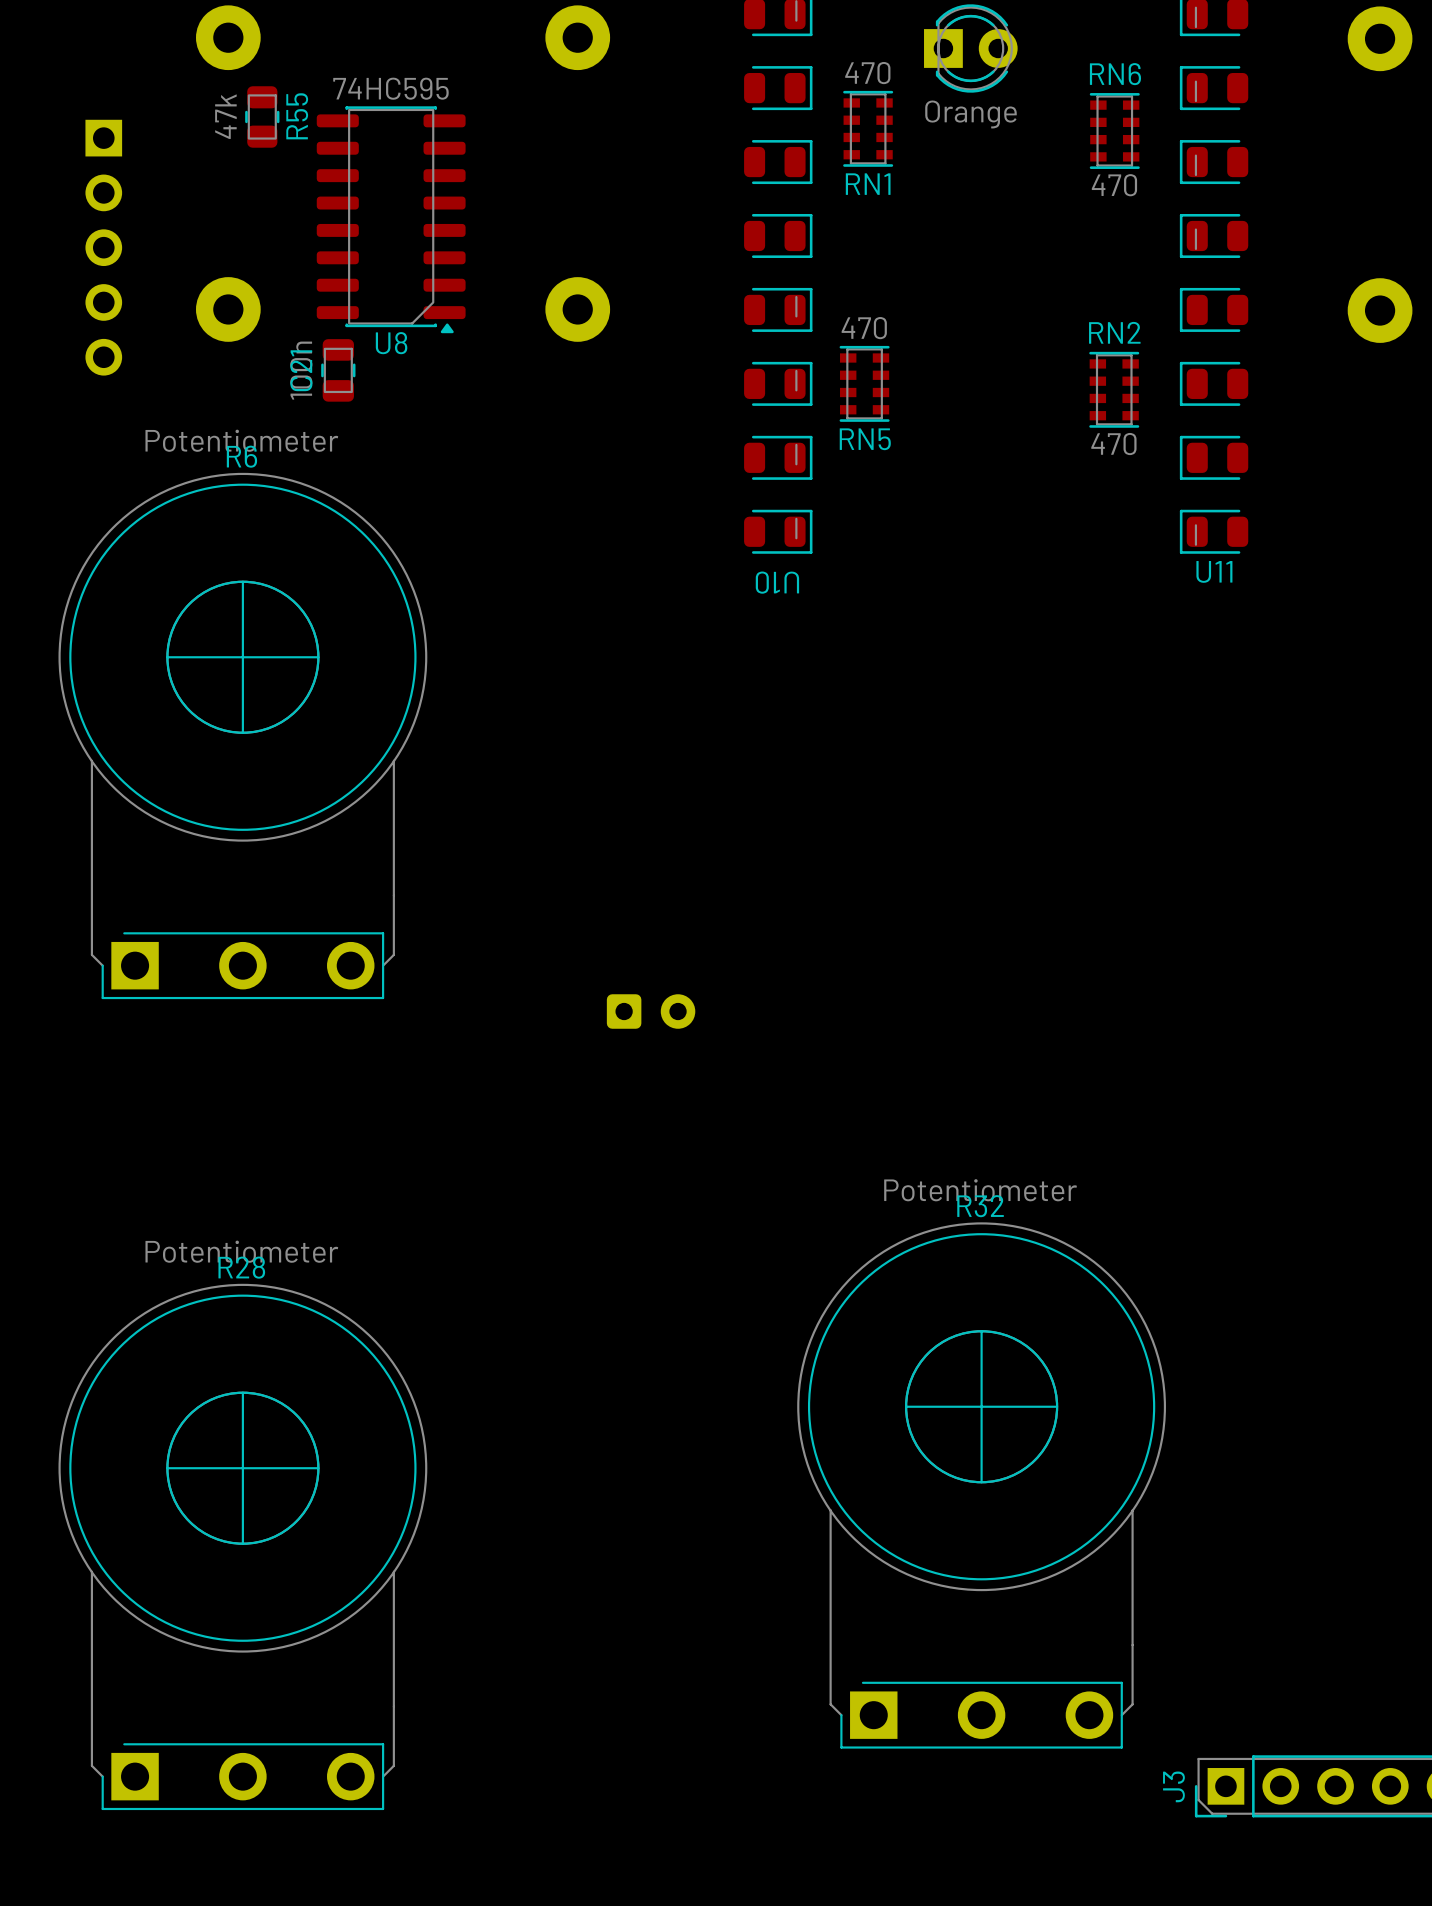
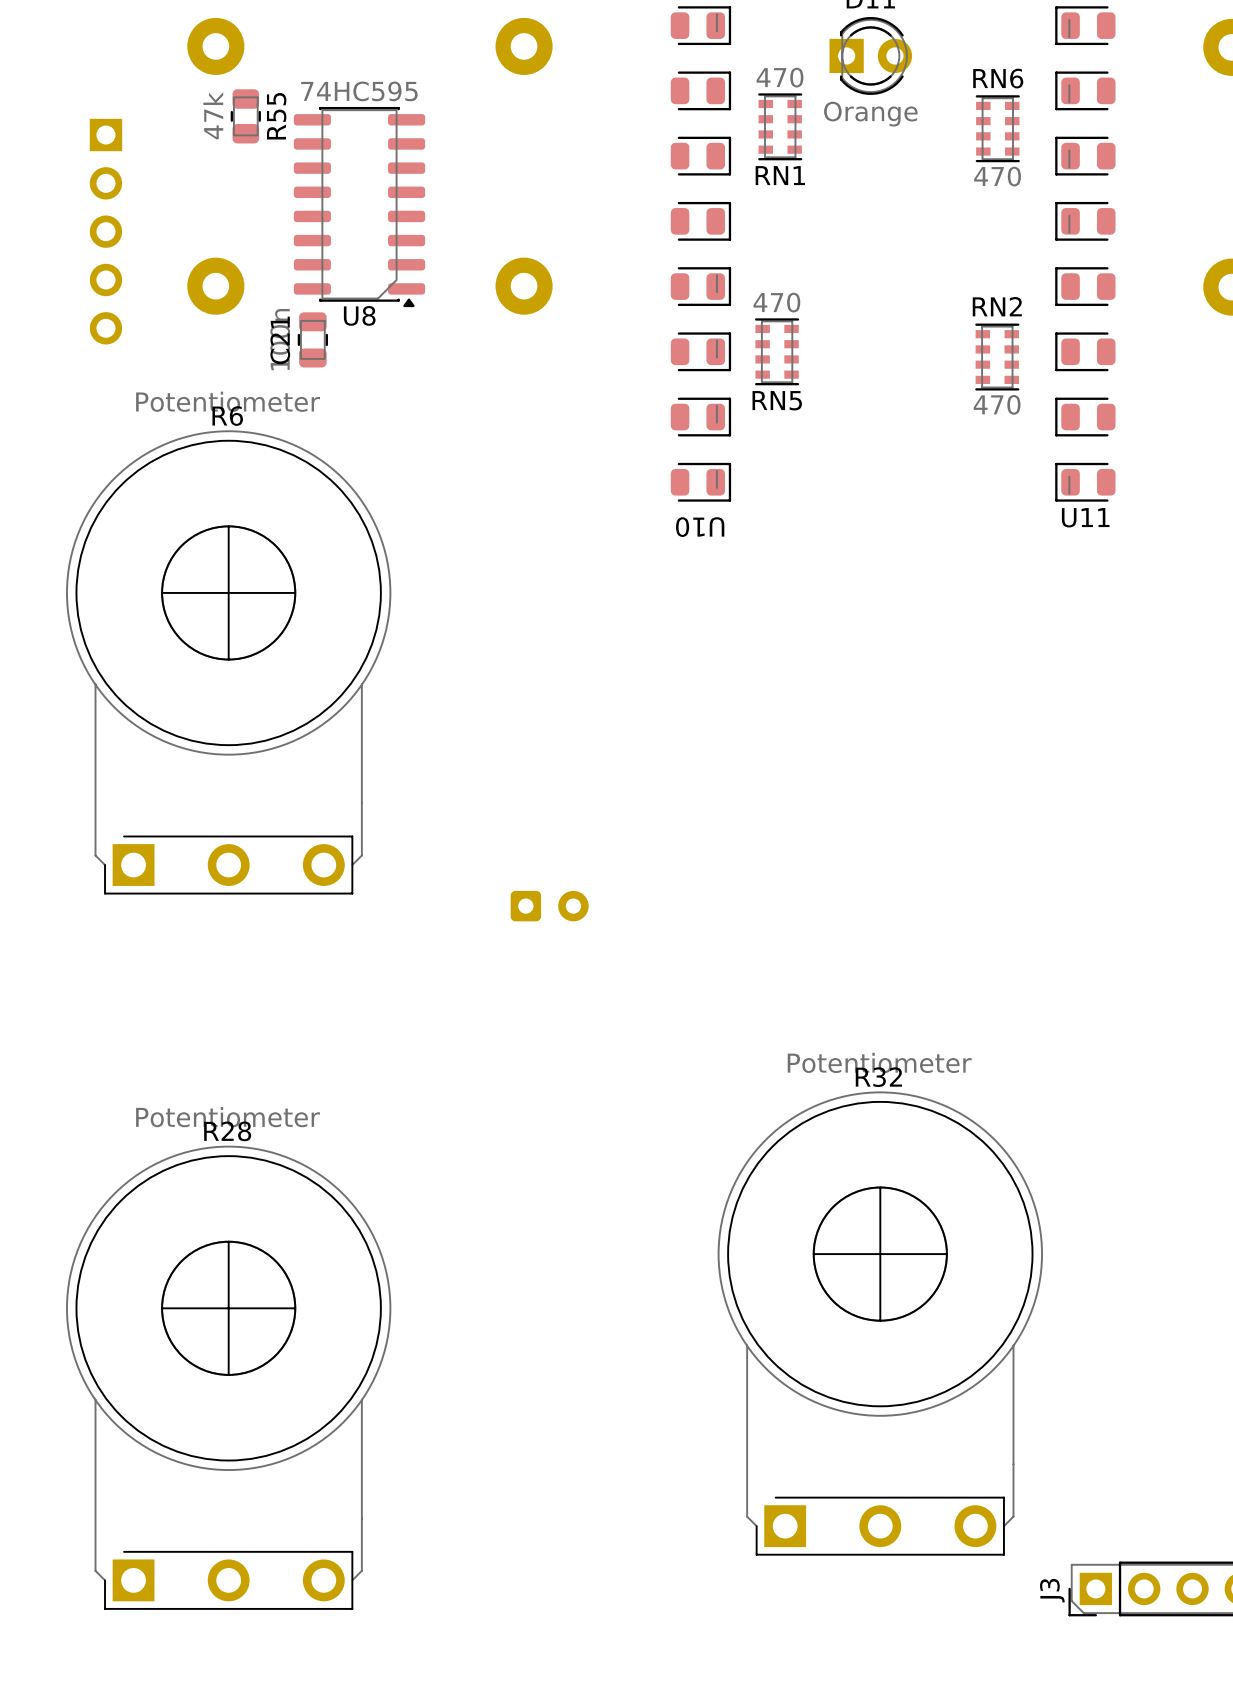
part position: (651, 1011) -> (549, 906)

